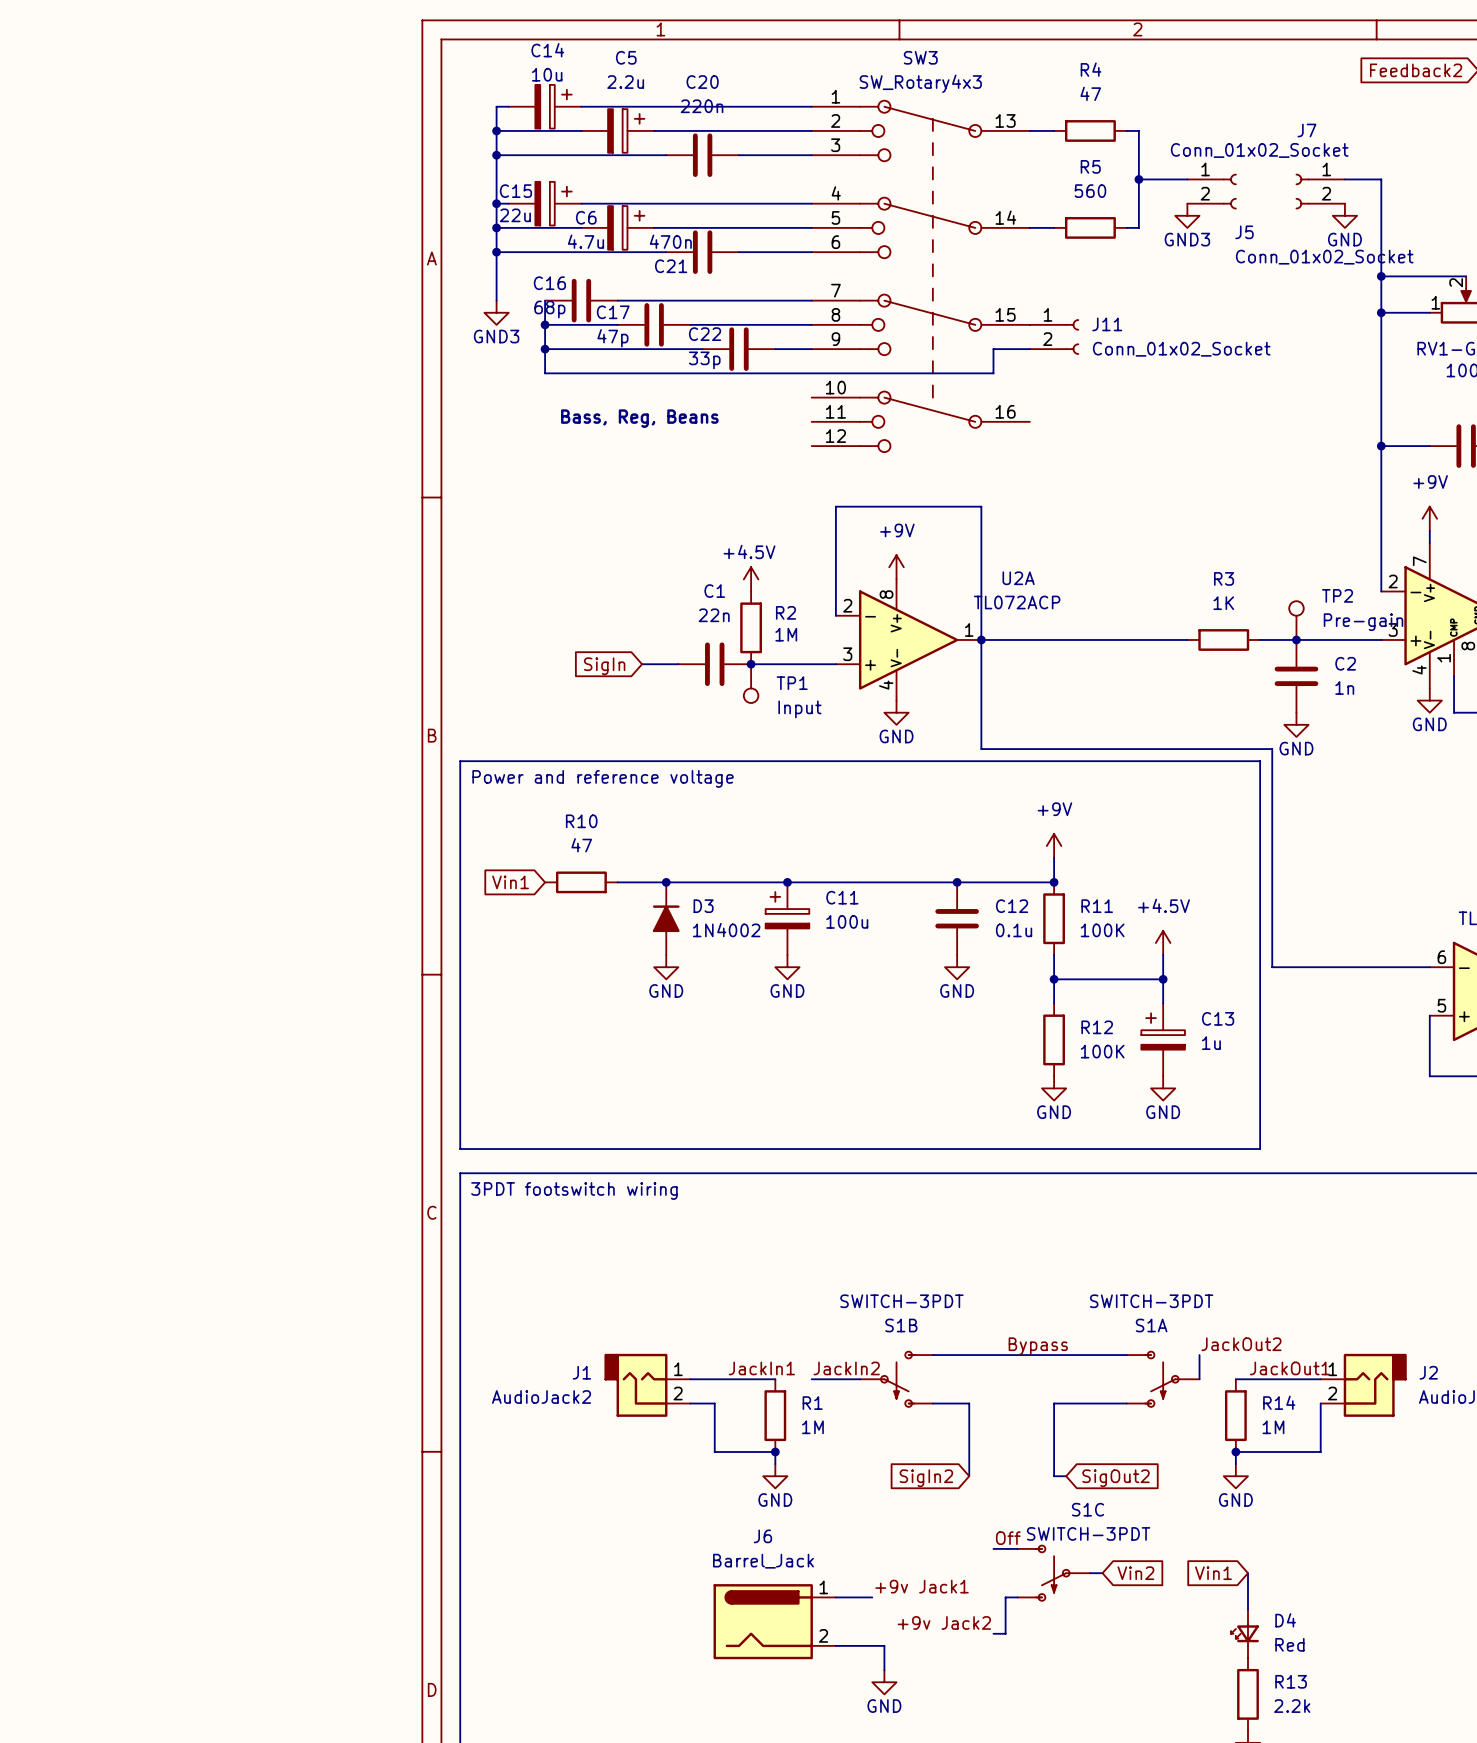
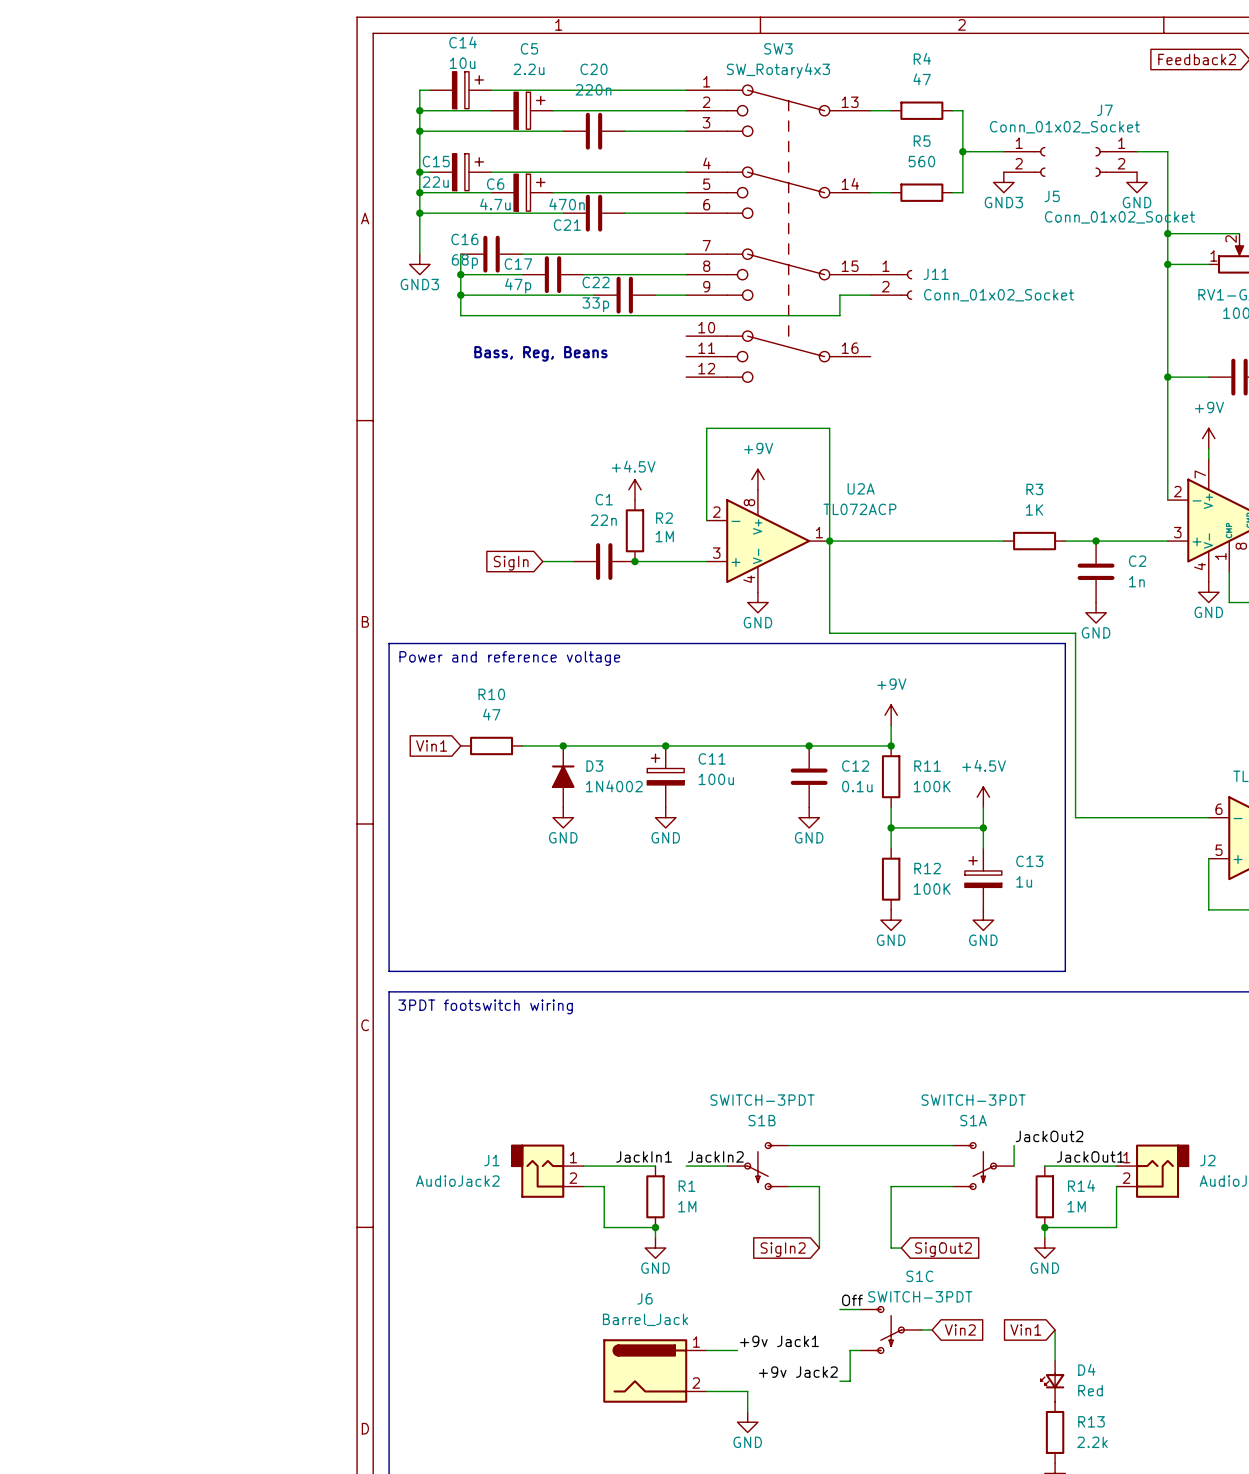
TP2: Pre-gain (1296, 620) -> none
TP1: Input (751, 683) -> none
label: Bypass (1038, 1346) -> none

